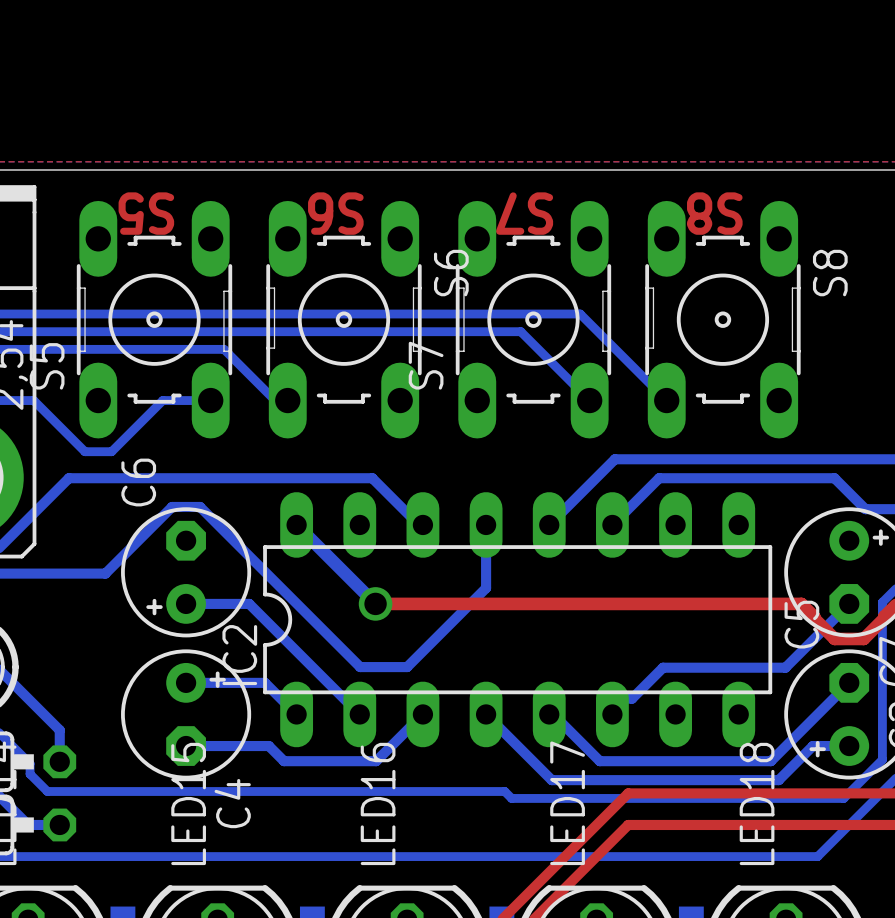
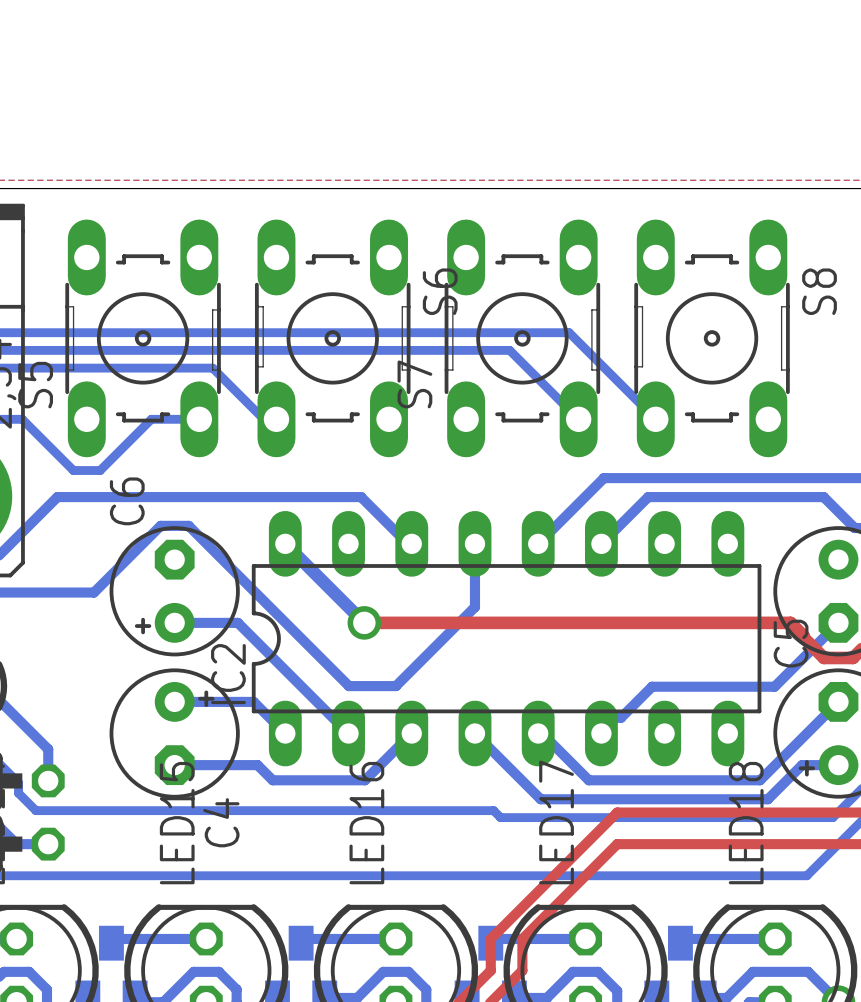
text: S5 (146, 213) -> none
text: S6 (335, 213) -> none
text: S7 (524, 213) -> none
text: S8 (714, 213) -> none

